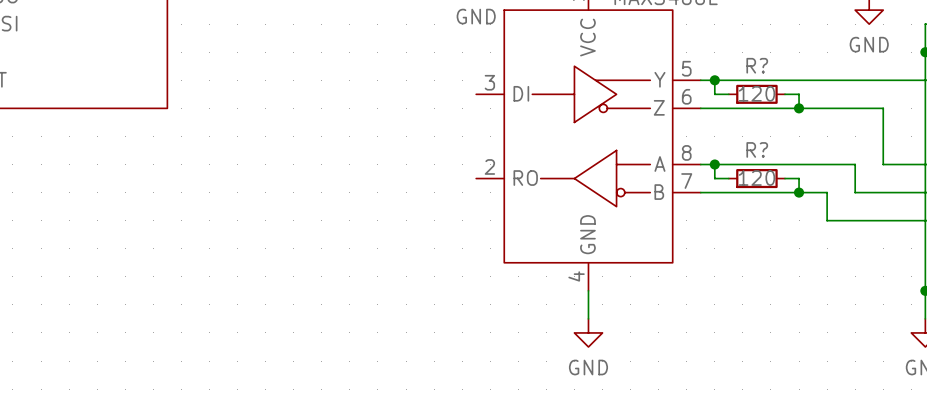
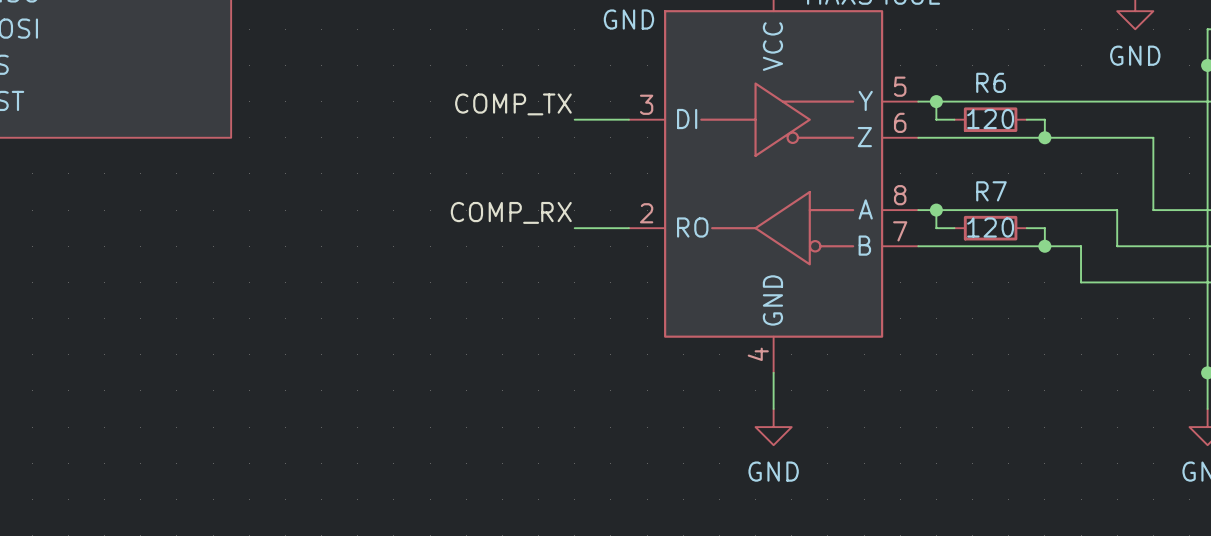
R? name: R? (757, 65) -> R6 (991, 82)
label: none -> COMP_TX (513, 104)
wire: none -> (574, 119) (628, 119)
R? name: R? (757, 149) -> R7 (991, 191)
label: none -> COMP_RX (511, 212)
wire: none -> (574, 228) (628, 228)

